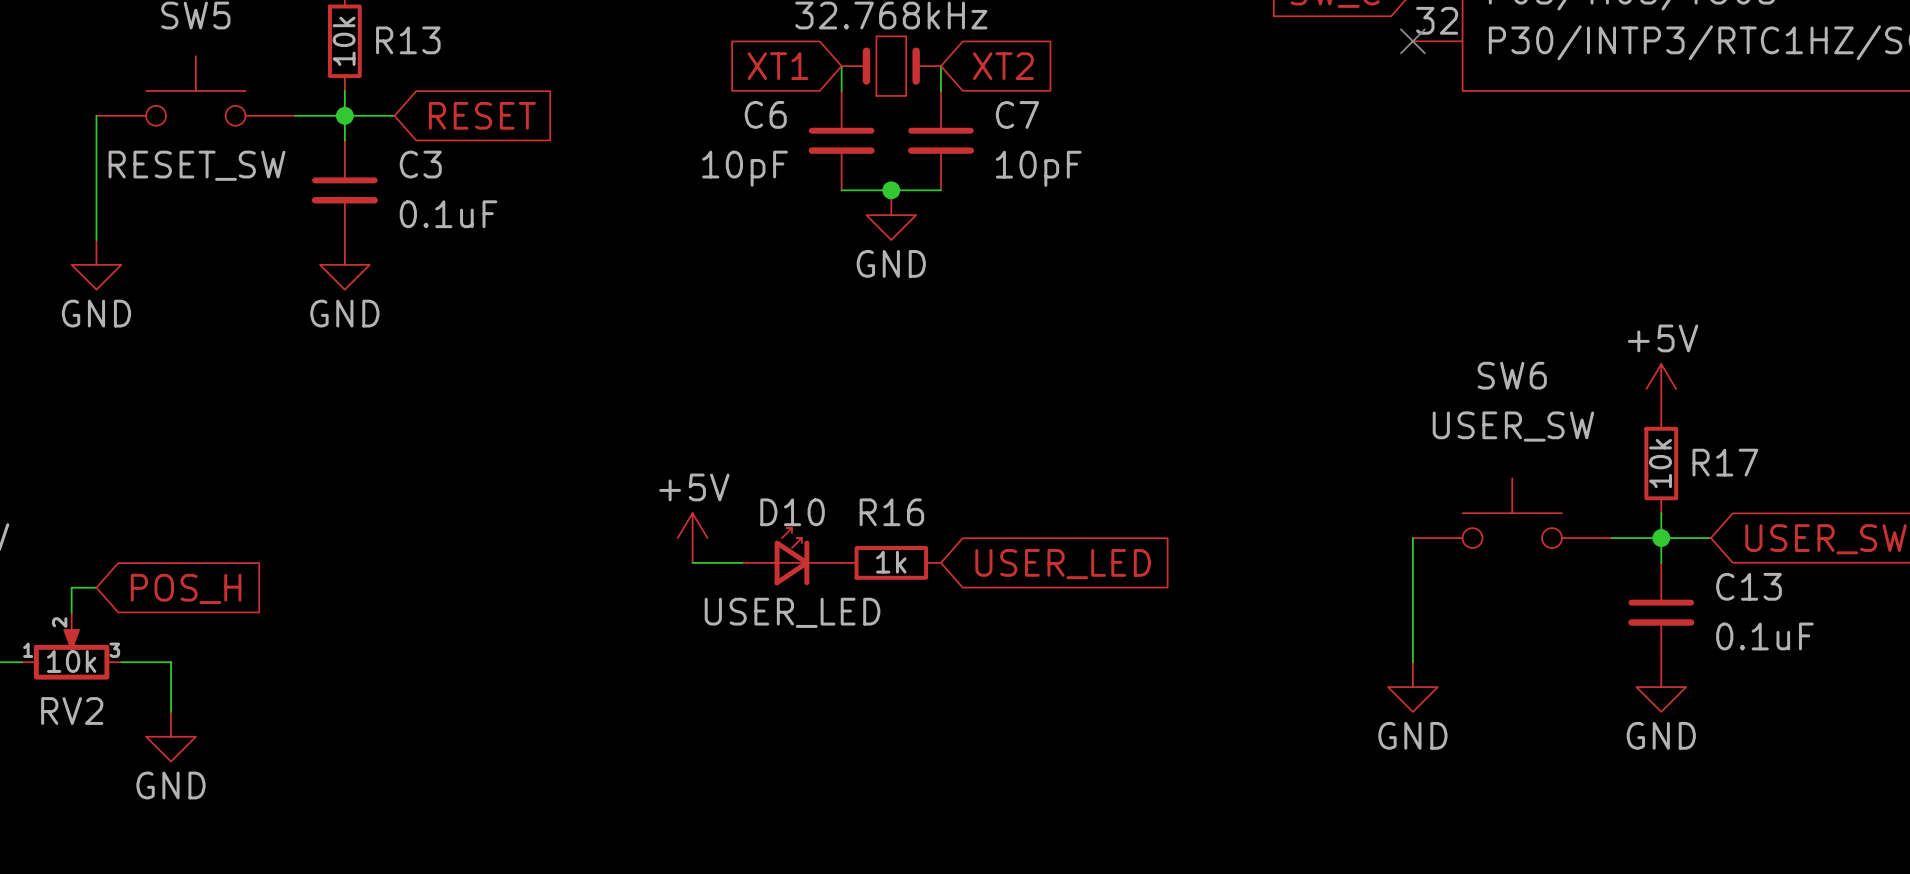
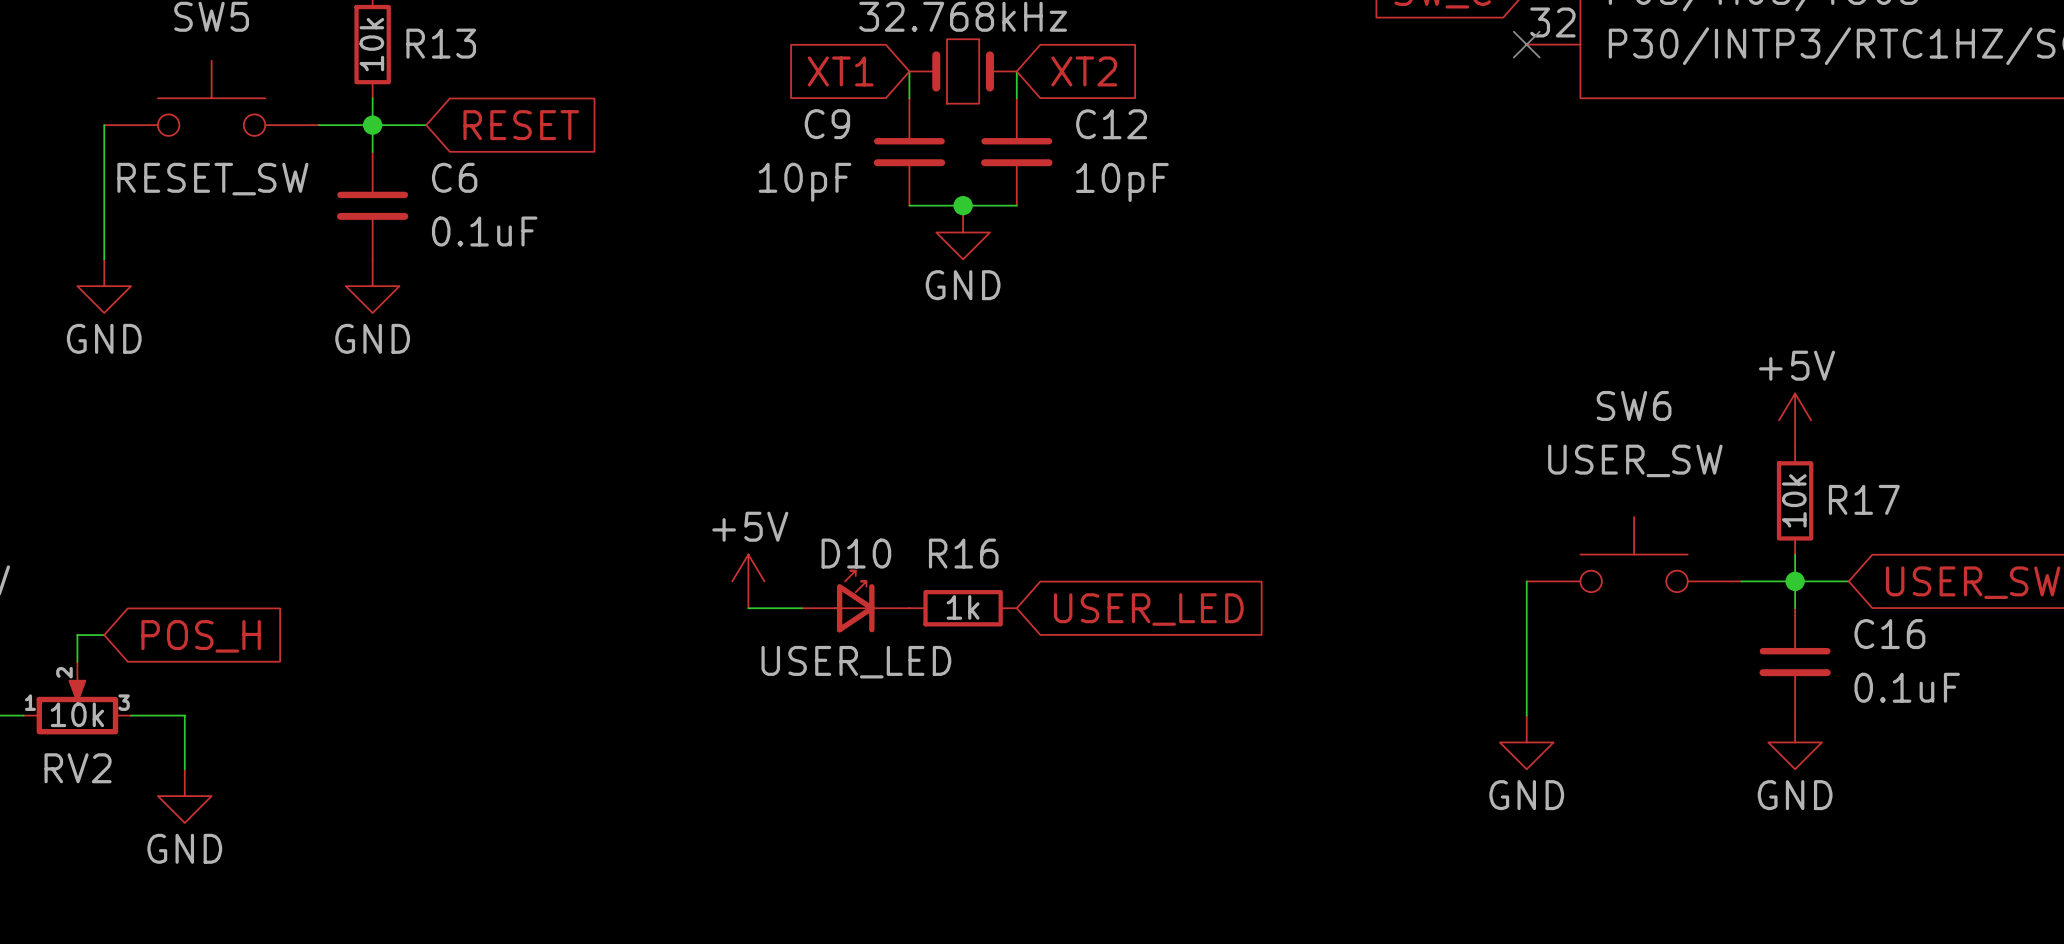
C6 name: C6 (765, 114) -> C9 (827, 124)
C7 name: C7 (1017, 115) -> C12 (1111, 124)
C3 name: C3 (420, 164) -> C6 (454, 177)
C13 name: C13 (1748, 586) -> C16 (1889, 634)

